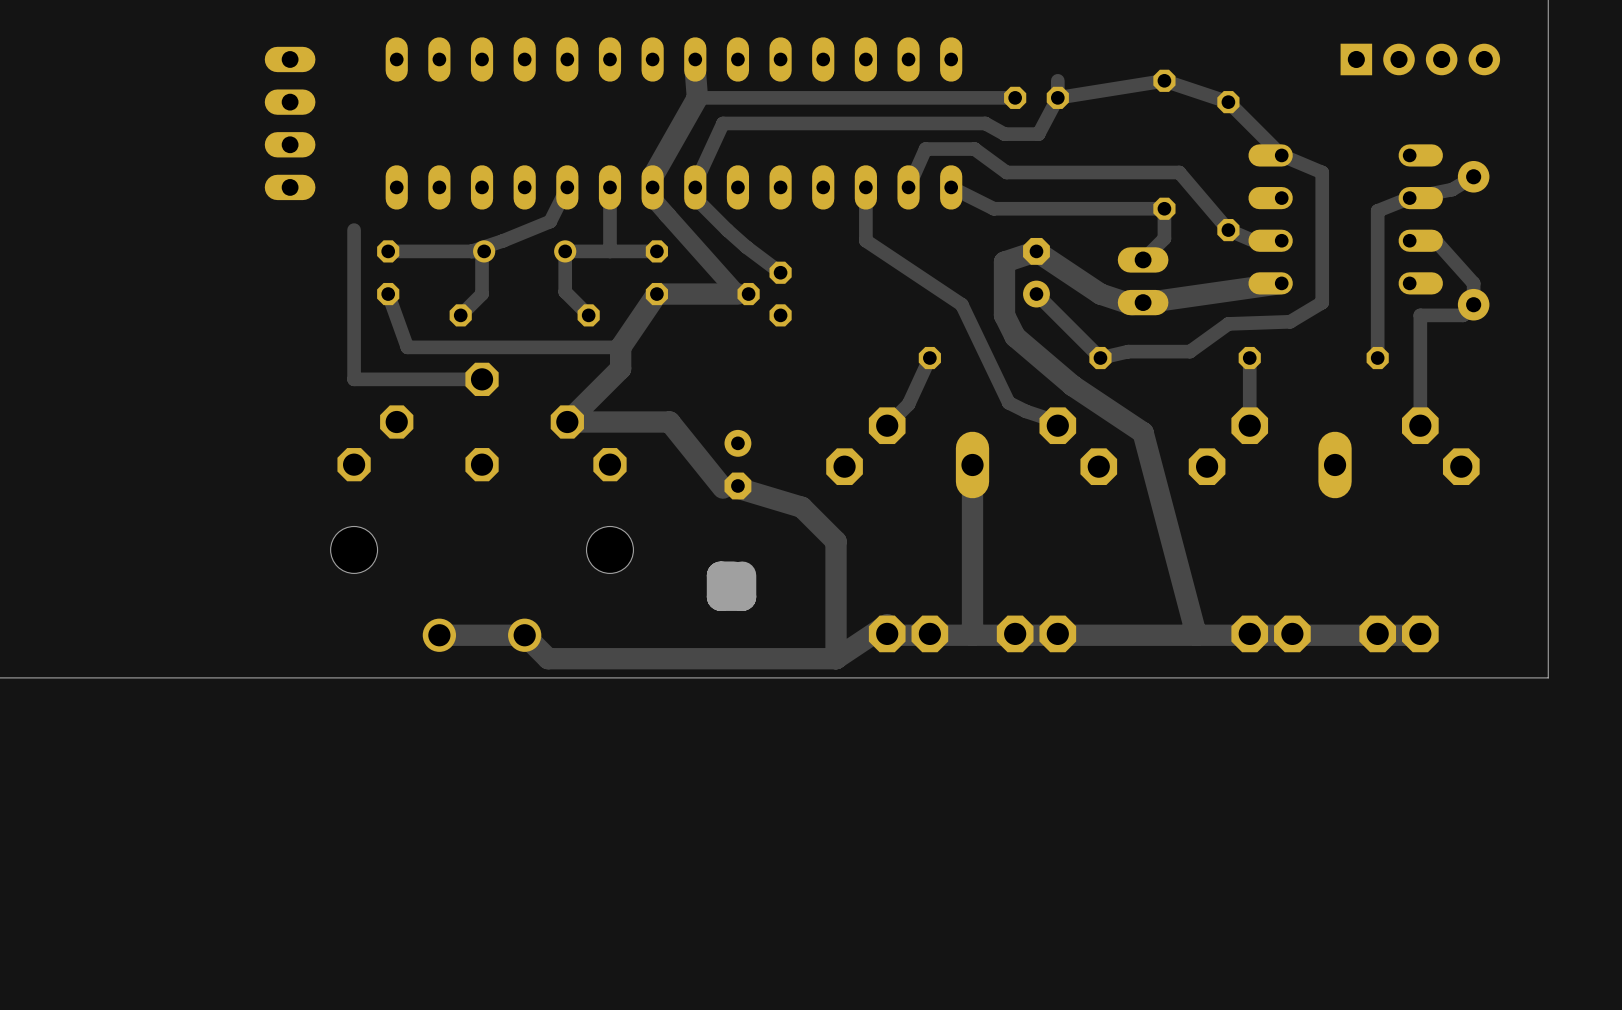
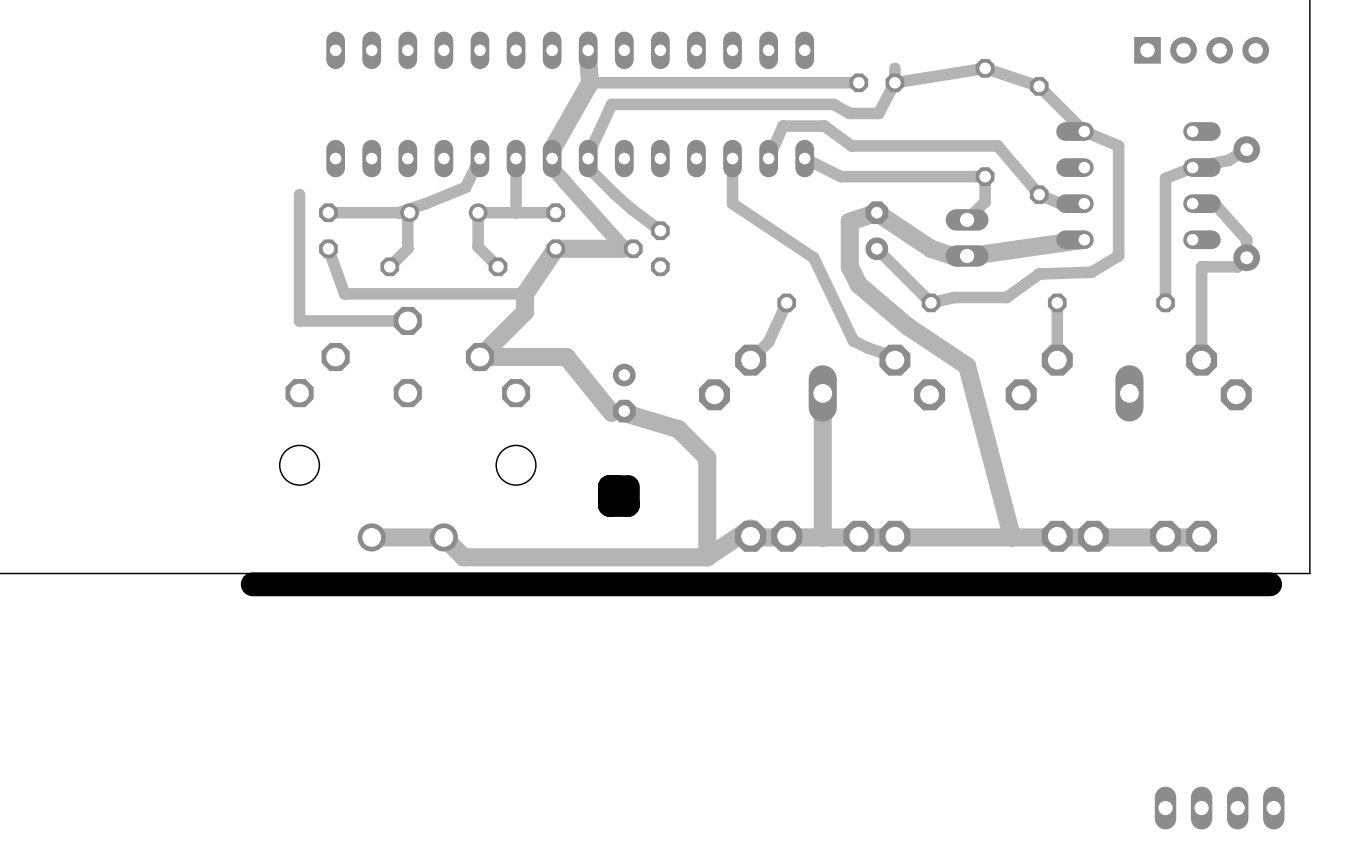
part: (290, 123) -> none
board edge: none -> (1270, 584) (252, 584)
part: none -> (1219, 808)

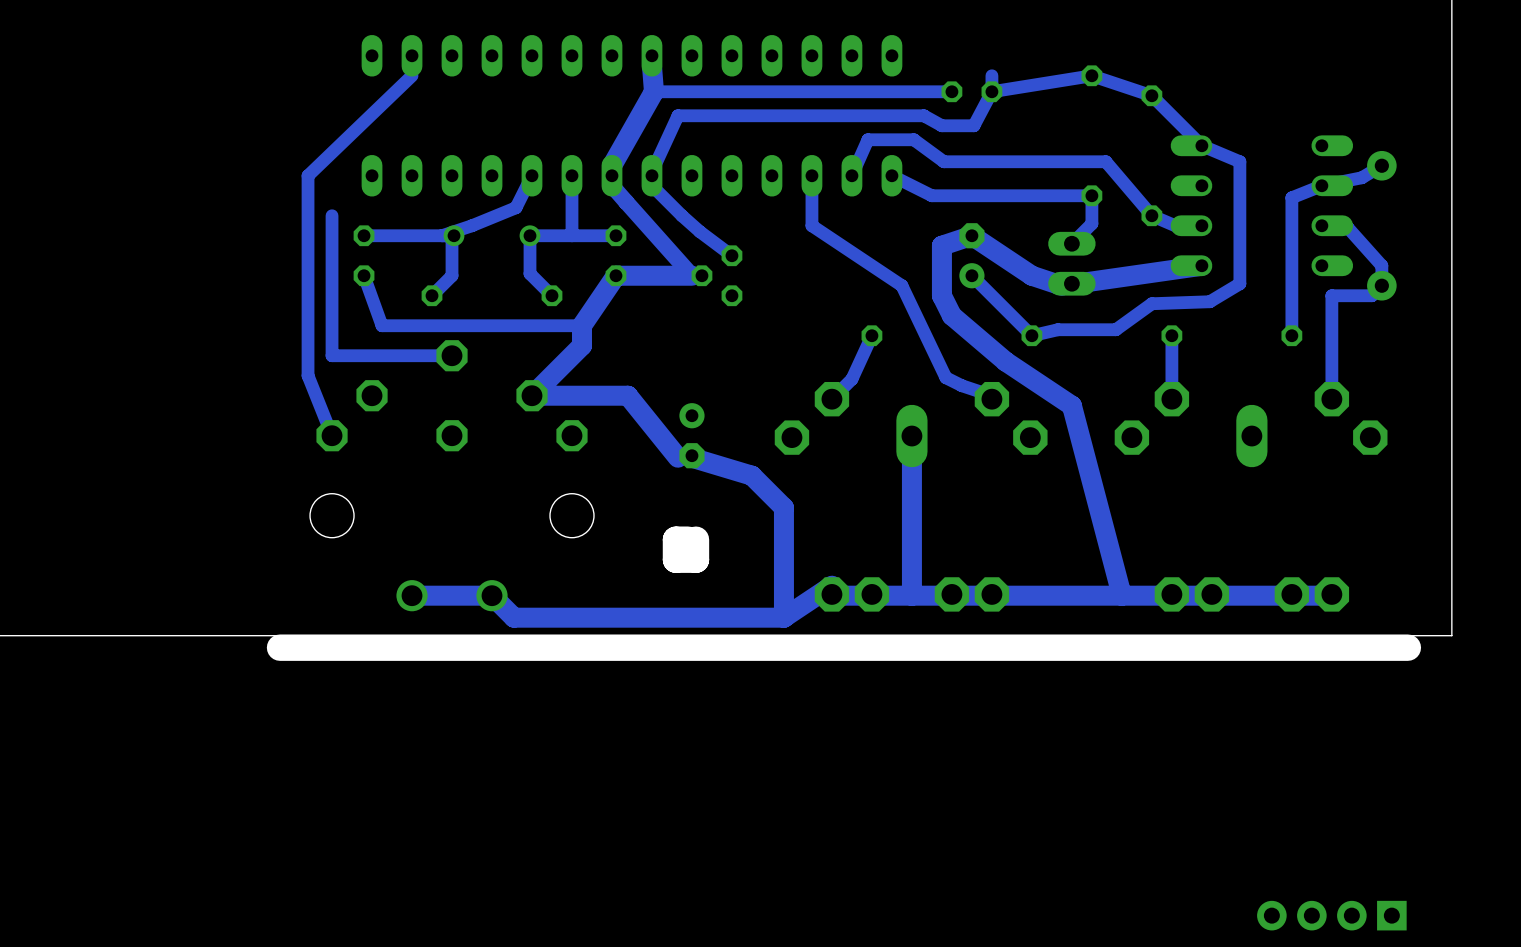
part: (1201, 50) -> none
track: none -> (412, 75) (308, 175) (308, 375) (332, 435)
part: (1219, 808) -> none
part: none -> (1331, 915)

